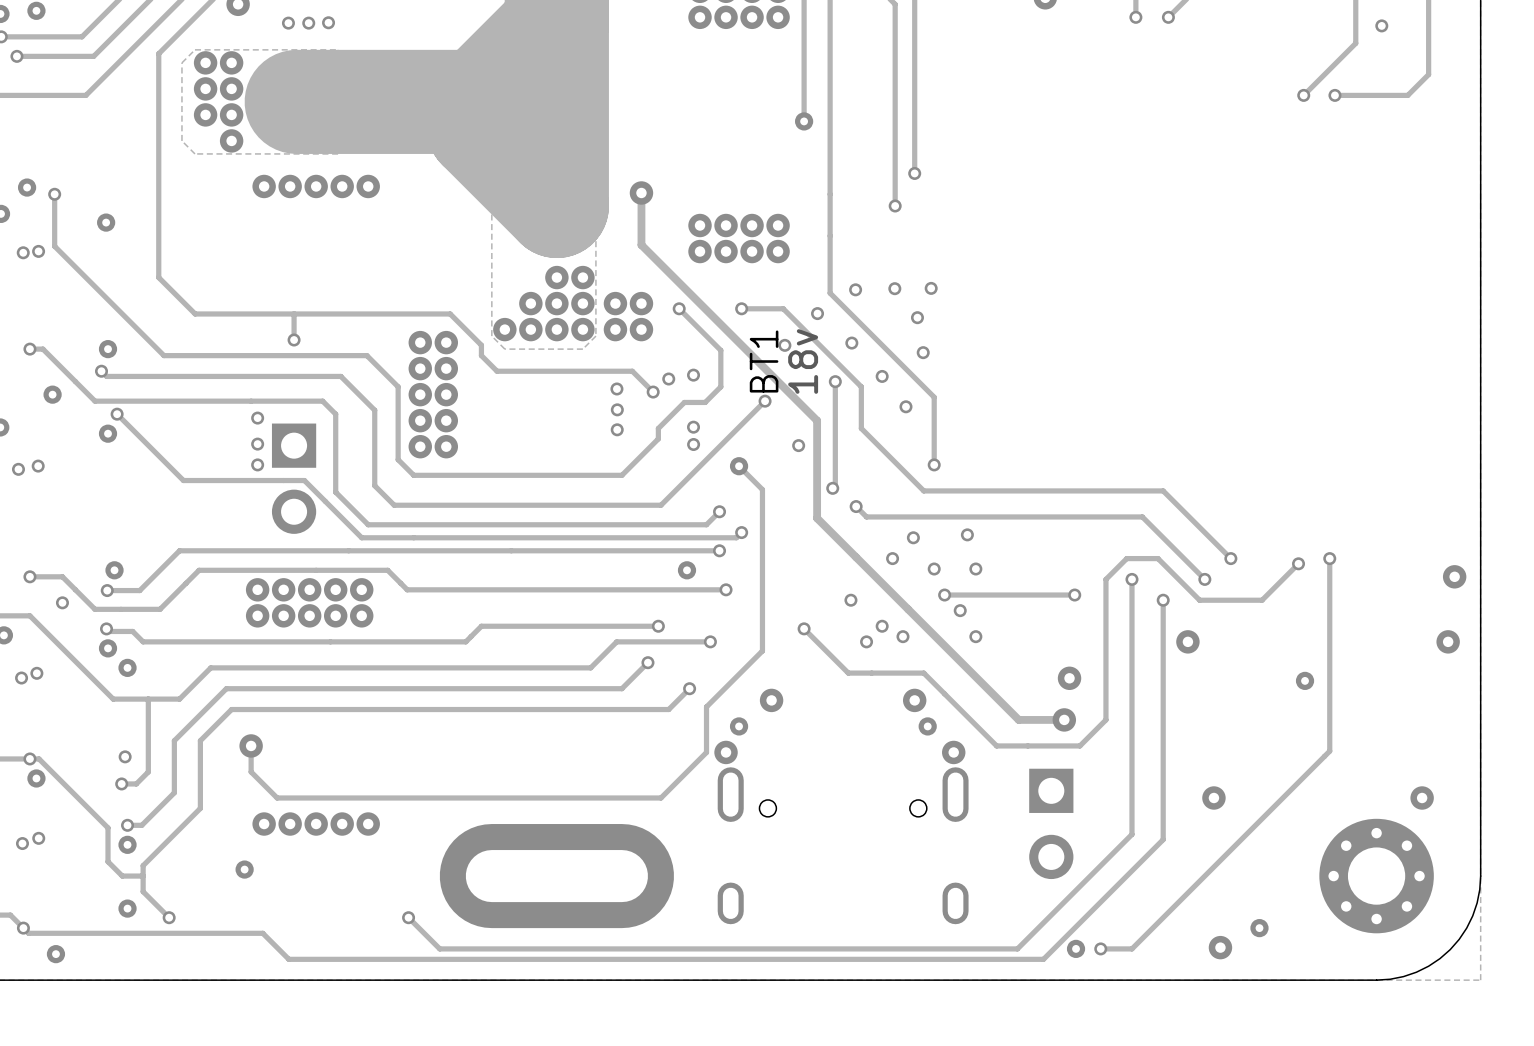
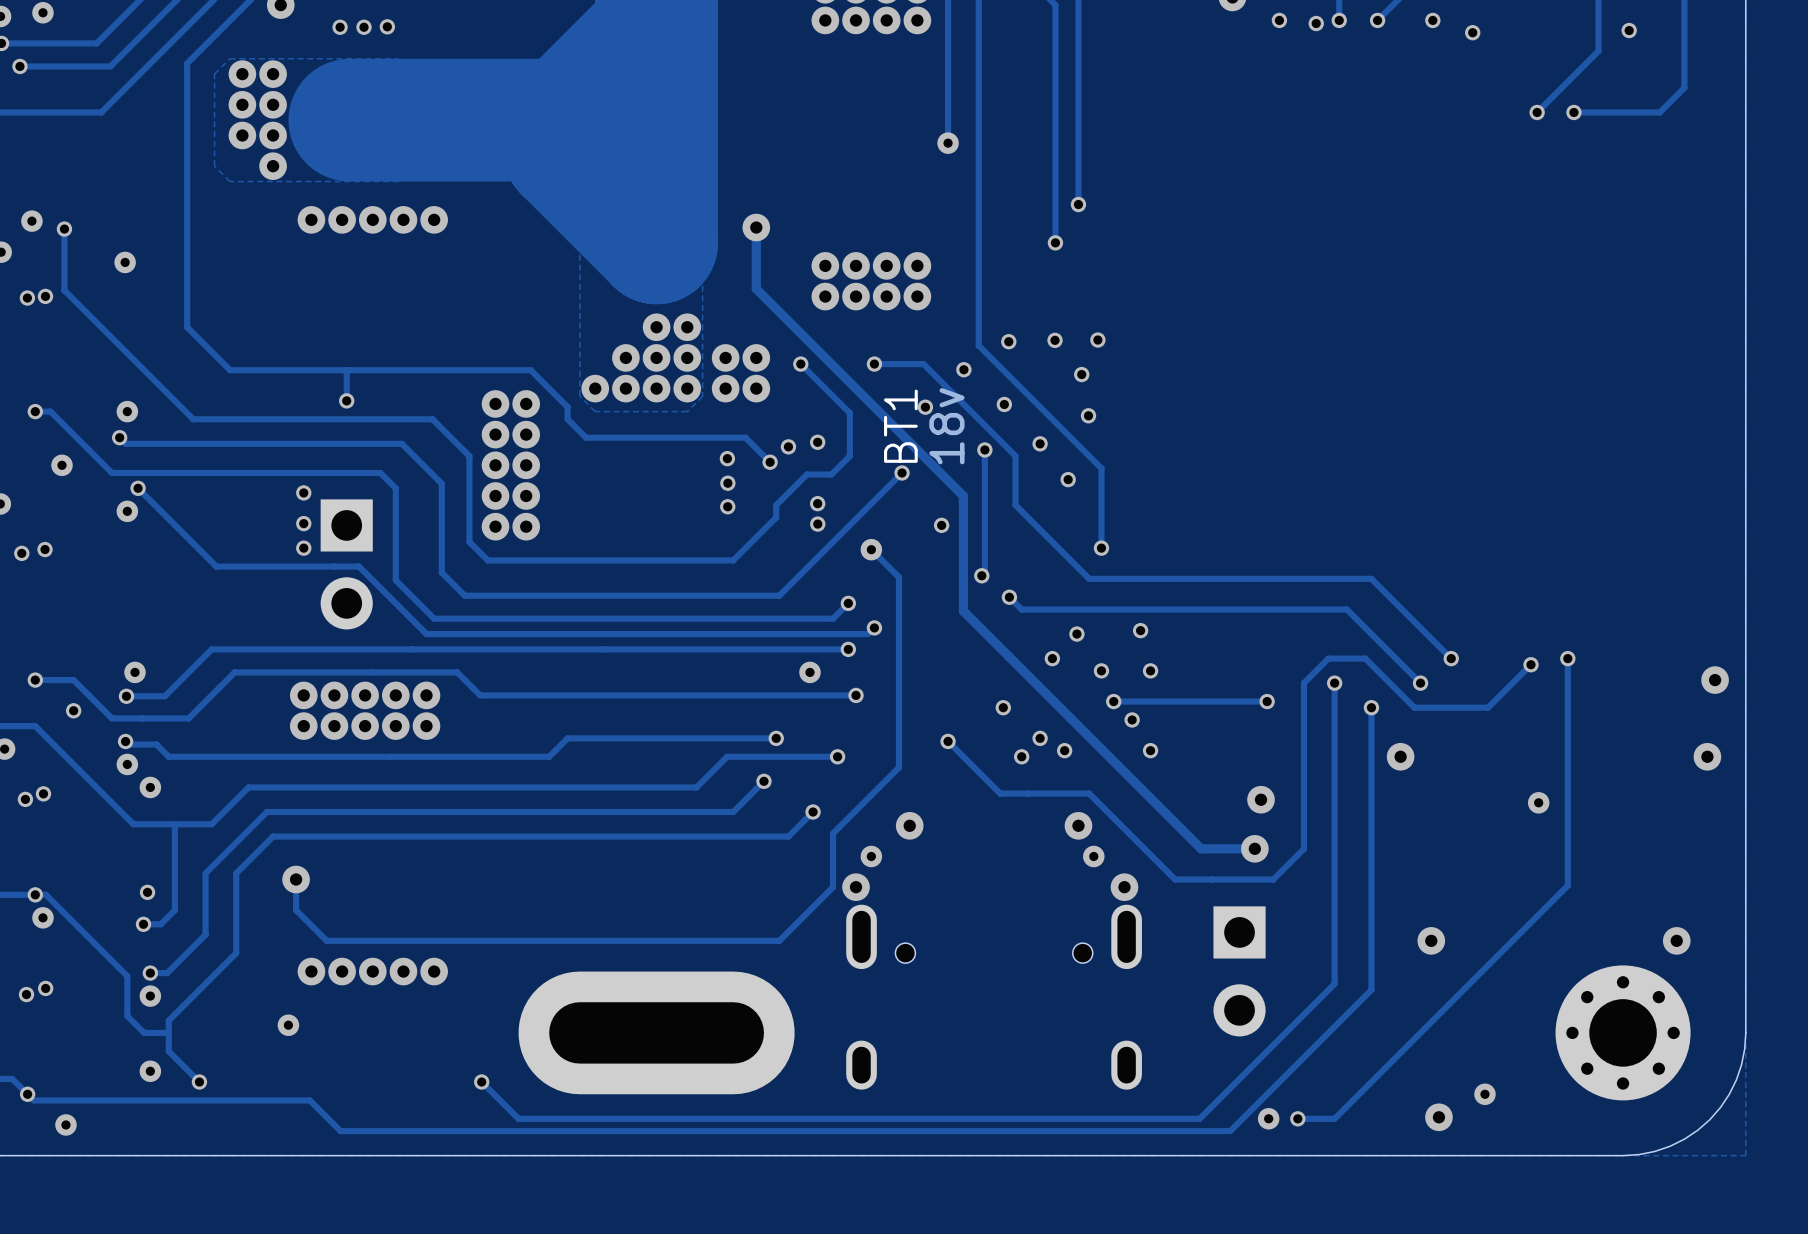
via: none -> (1279, 20)
via: none -> (1432, 20)
via: none -> (1316, 23)
via: none -> (1472, 32)

